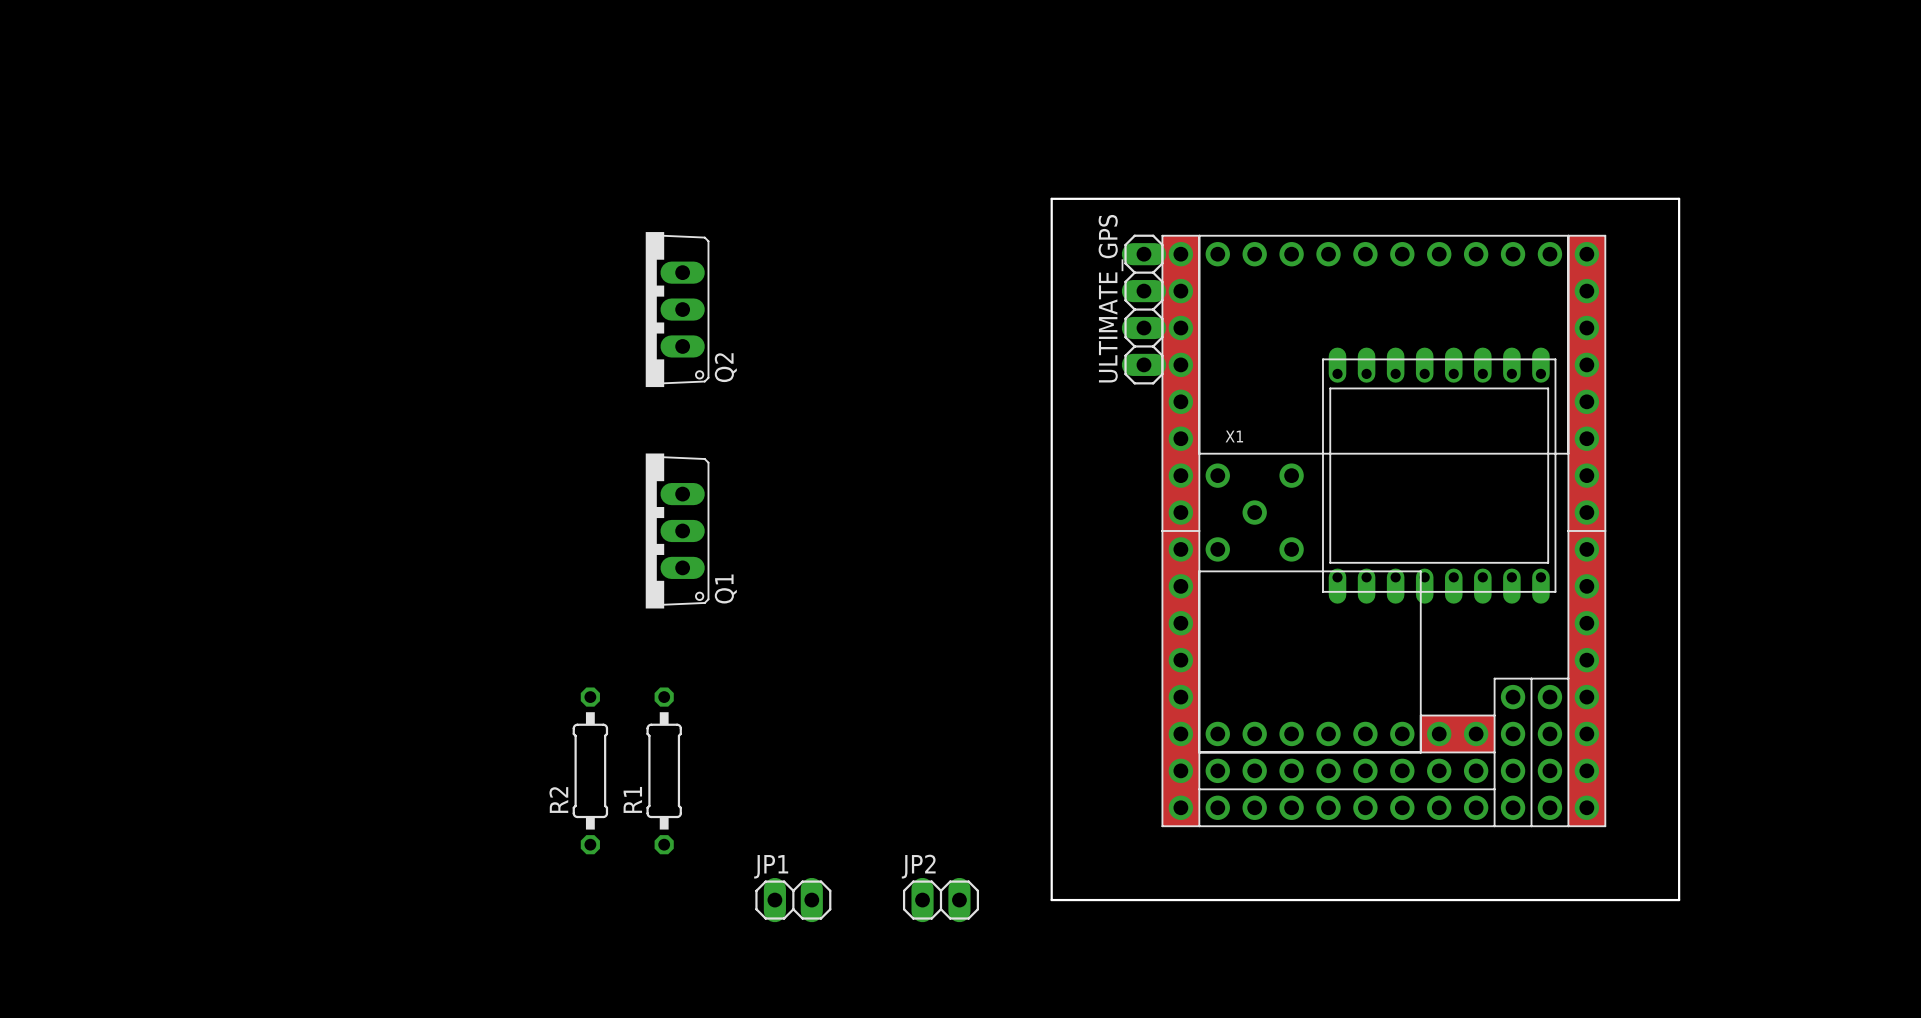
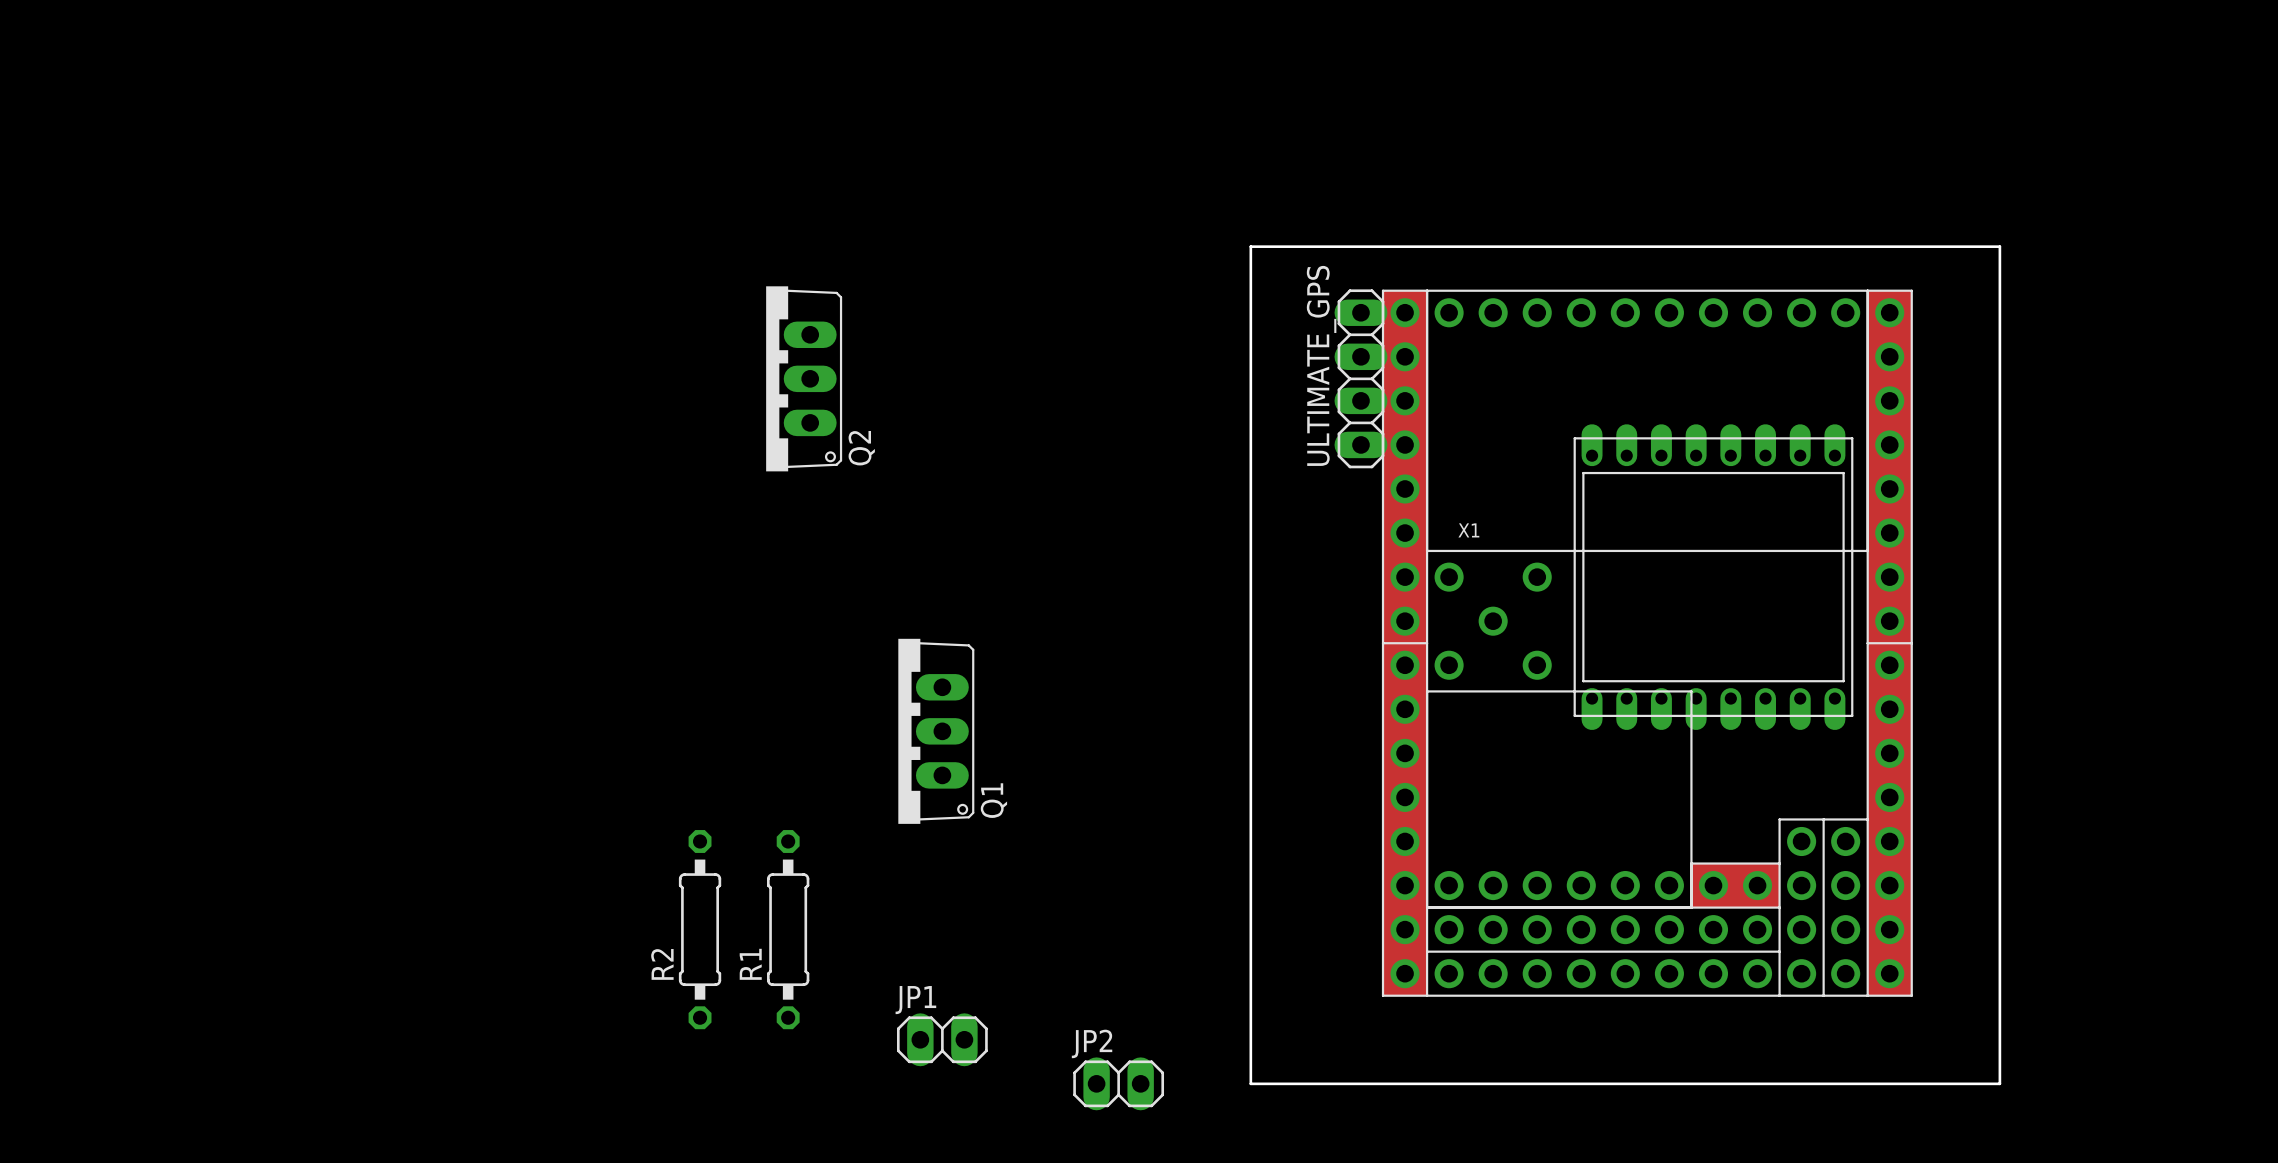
Q1 position: (677, 530) -> (936, 731)
JP1 position: (793, 900) -> (942, 1039)

